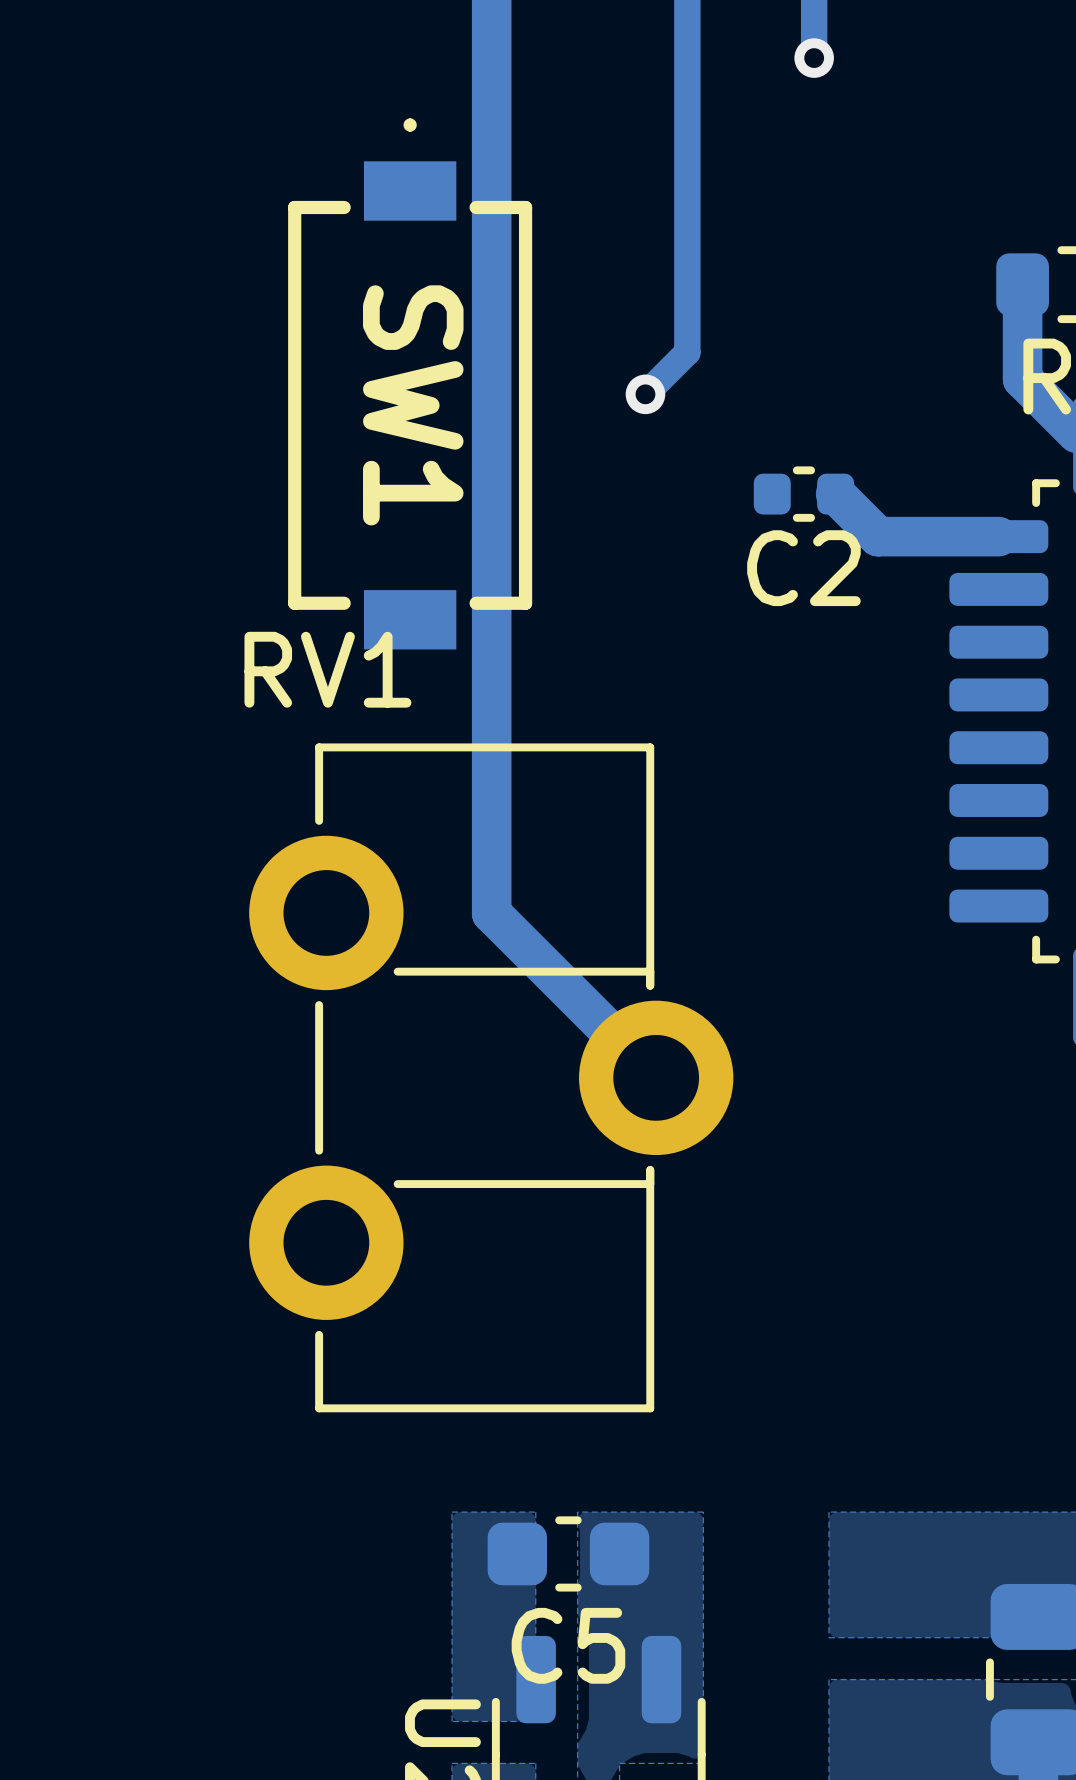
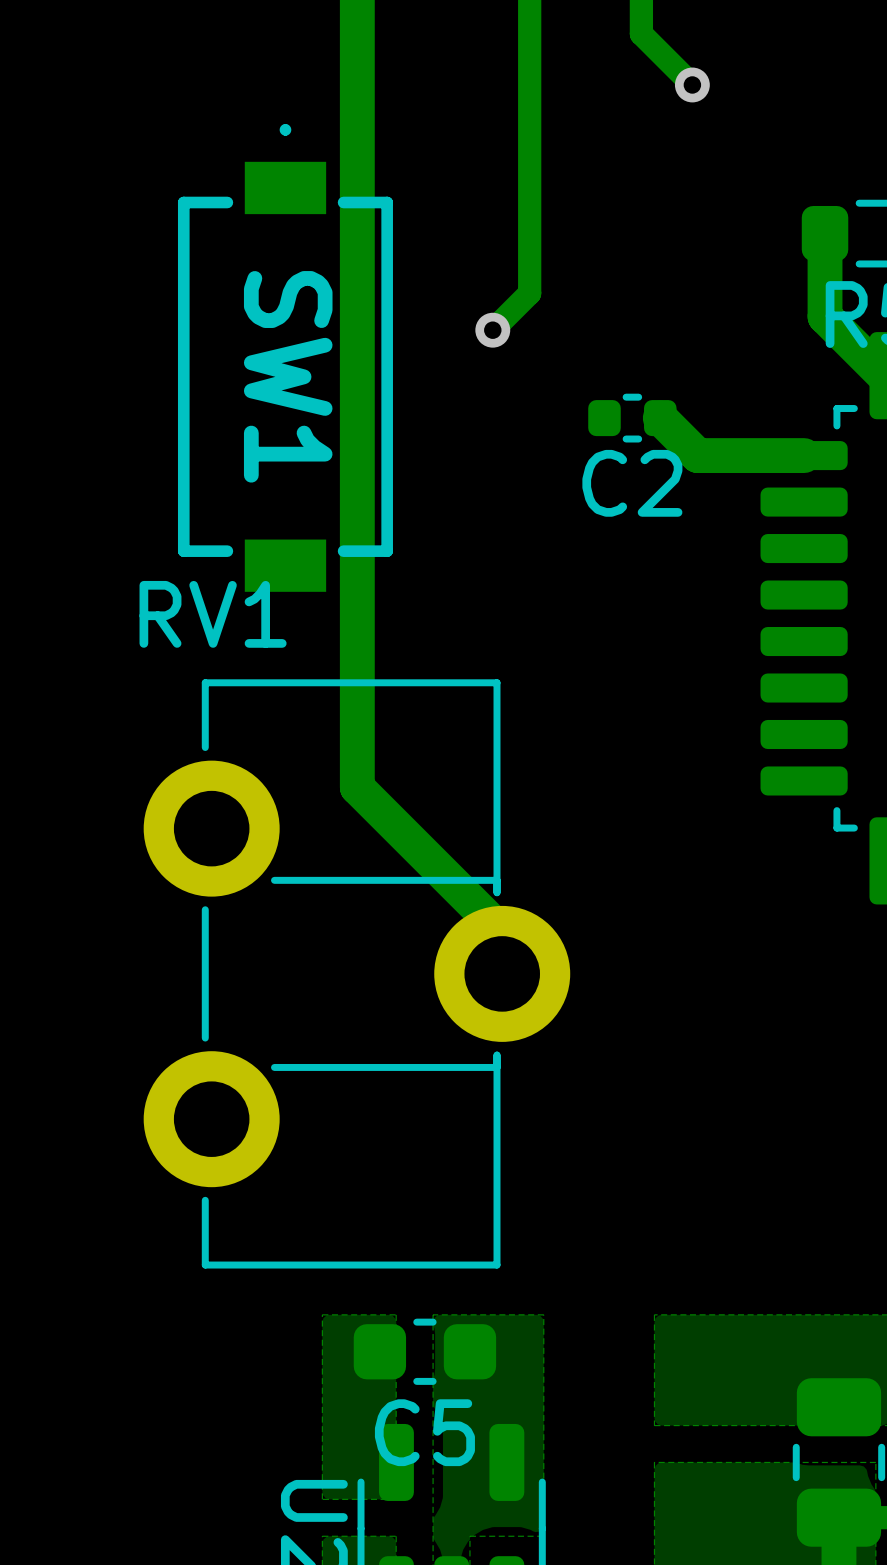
track: none -> (641, 33) (692, 84)
via position: (814, 58) -> (692, 84)
SW1 position: (410, 383) -> (285, 357)
RV1 position: (491, 1077) -> (356, 973)

